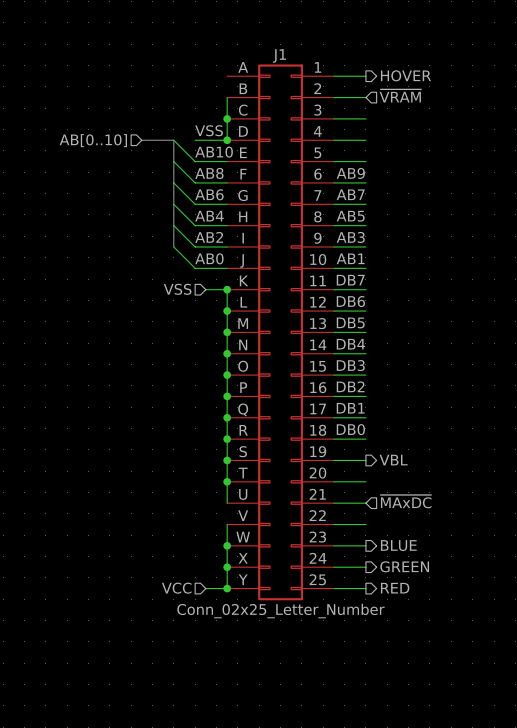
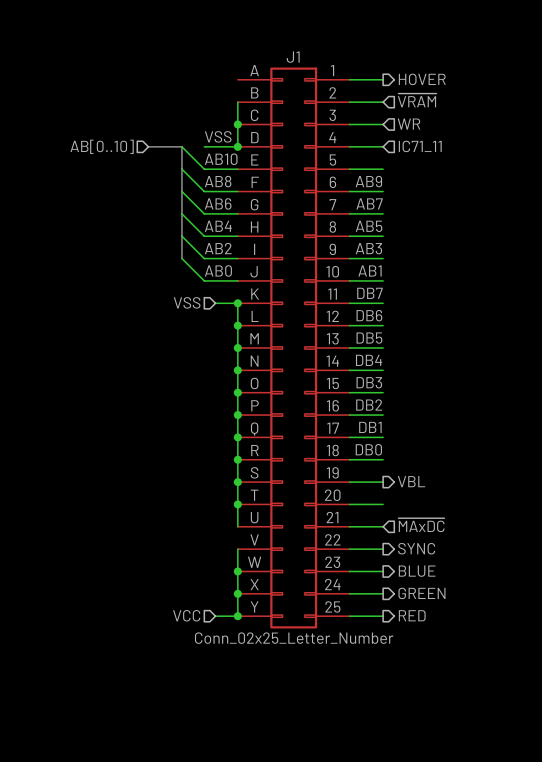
hierarchical label: none -> WR (409, 124)
hierarchical label: none -> IC71_11 (420, 146)
hierarchical label: none -> SYNC (416, 548)

